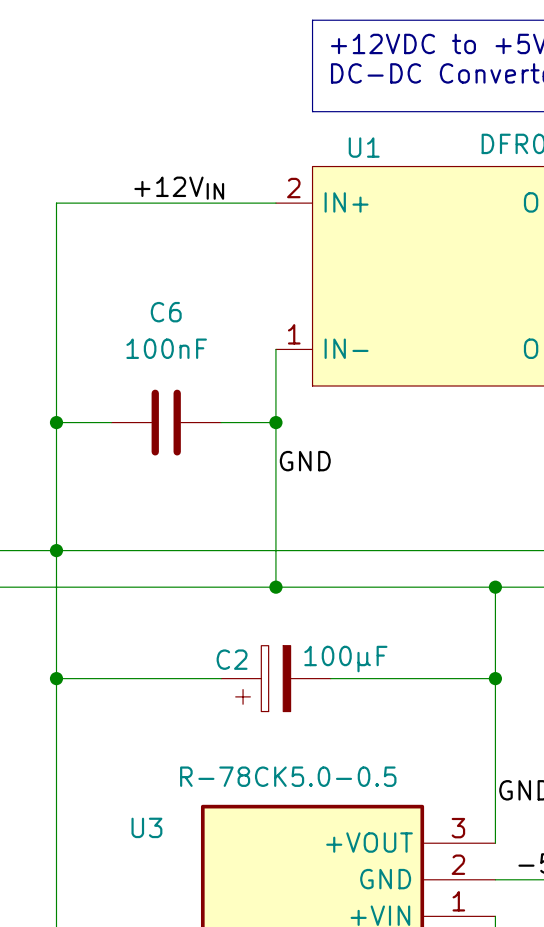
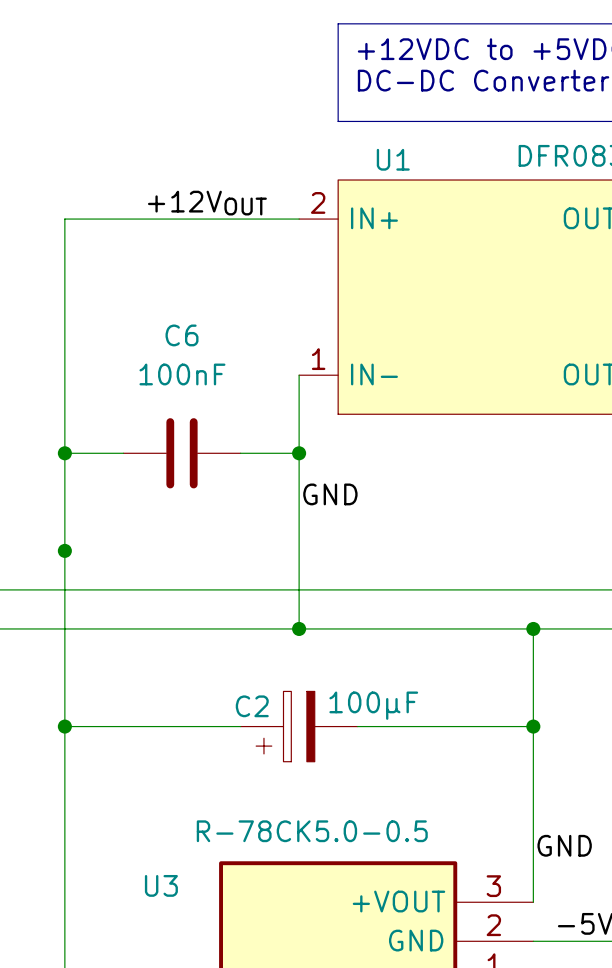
label: +12VIN (179, 188) -> +12VOUT (207, 203)
junction position: (56, 550) -> (64, 550)

